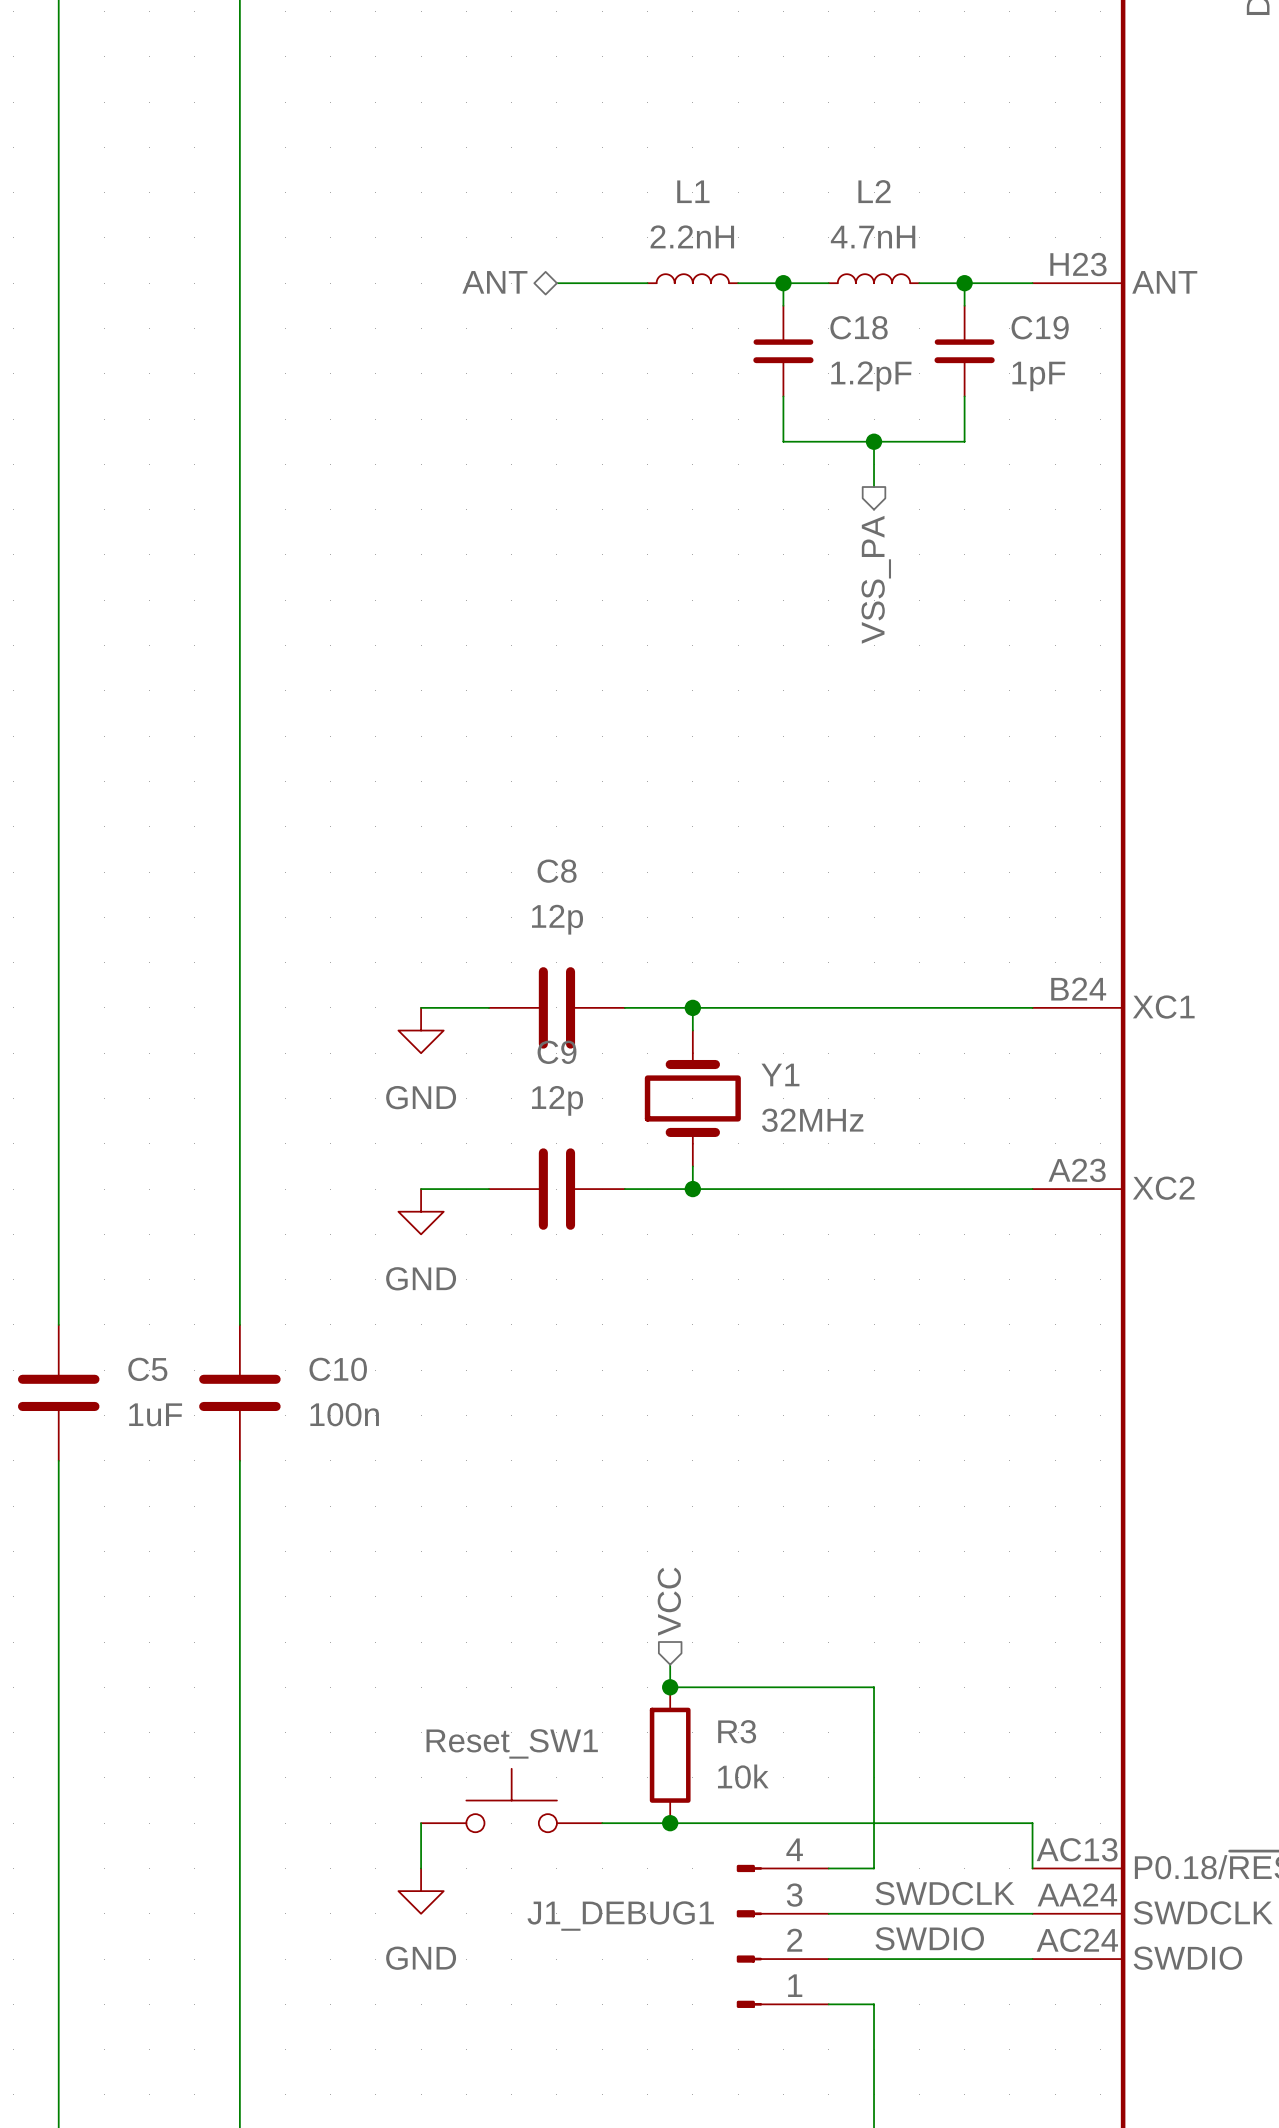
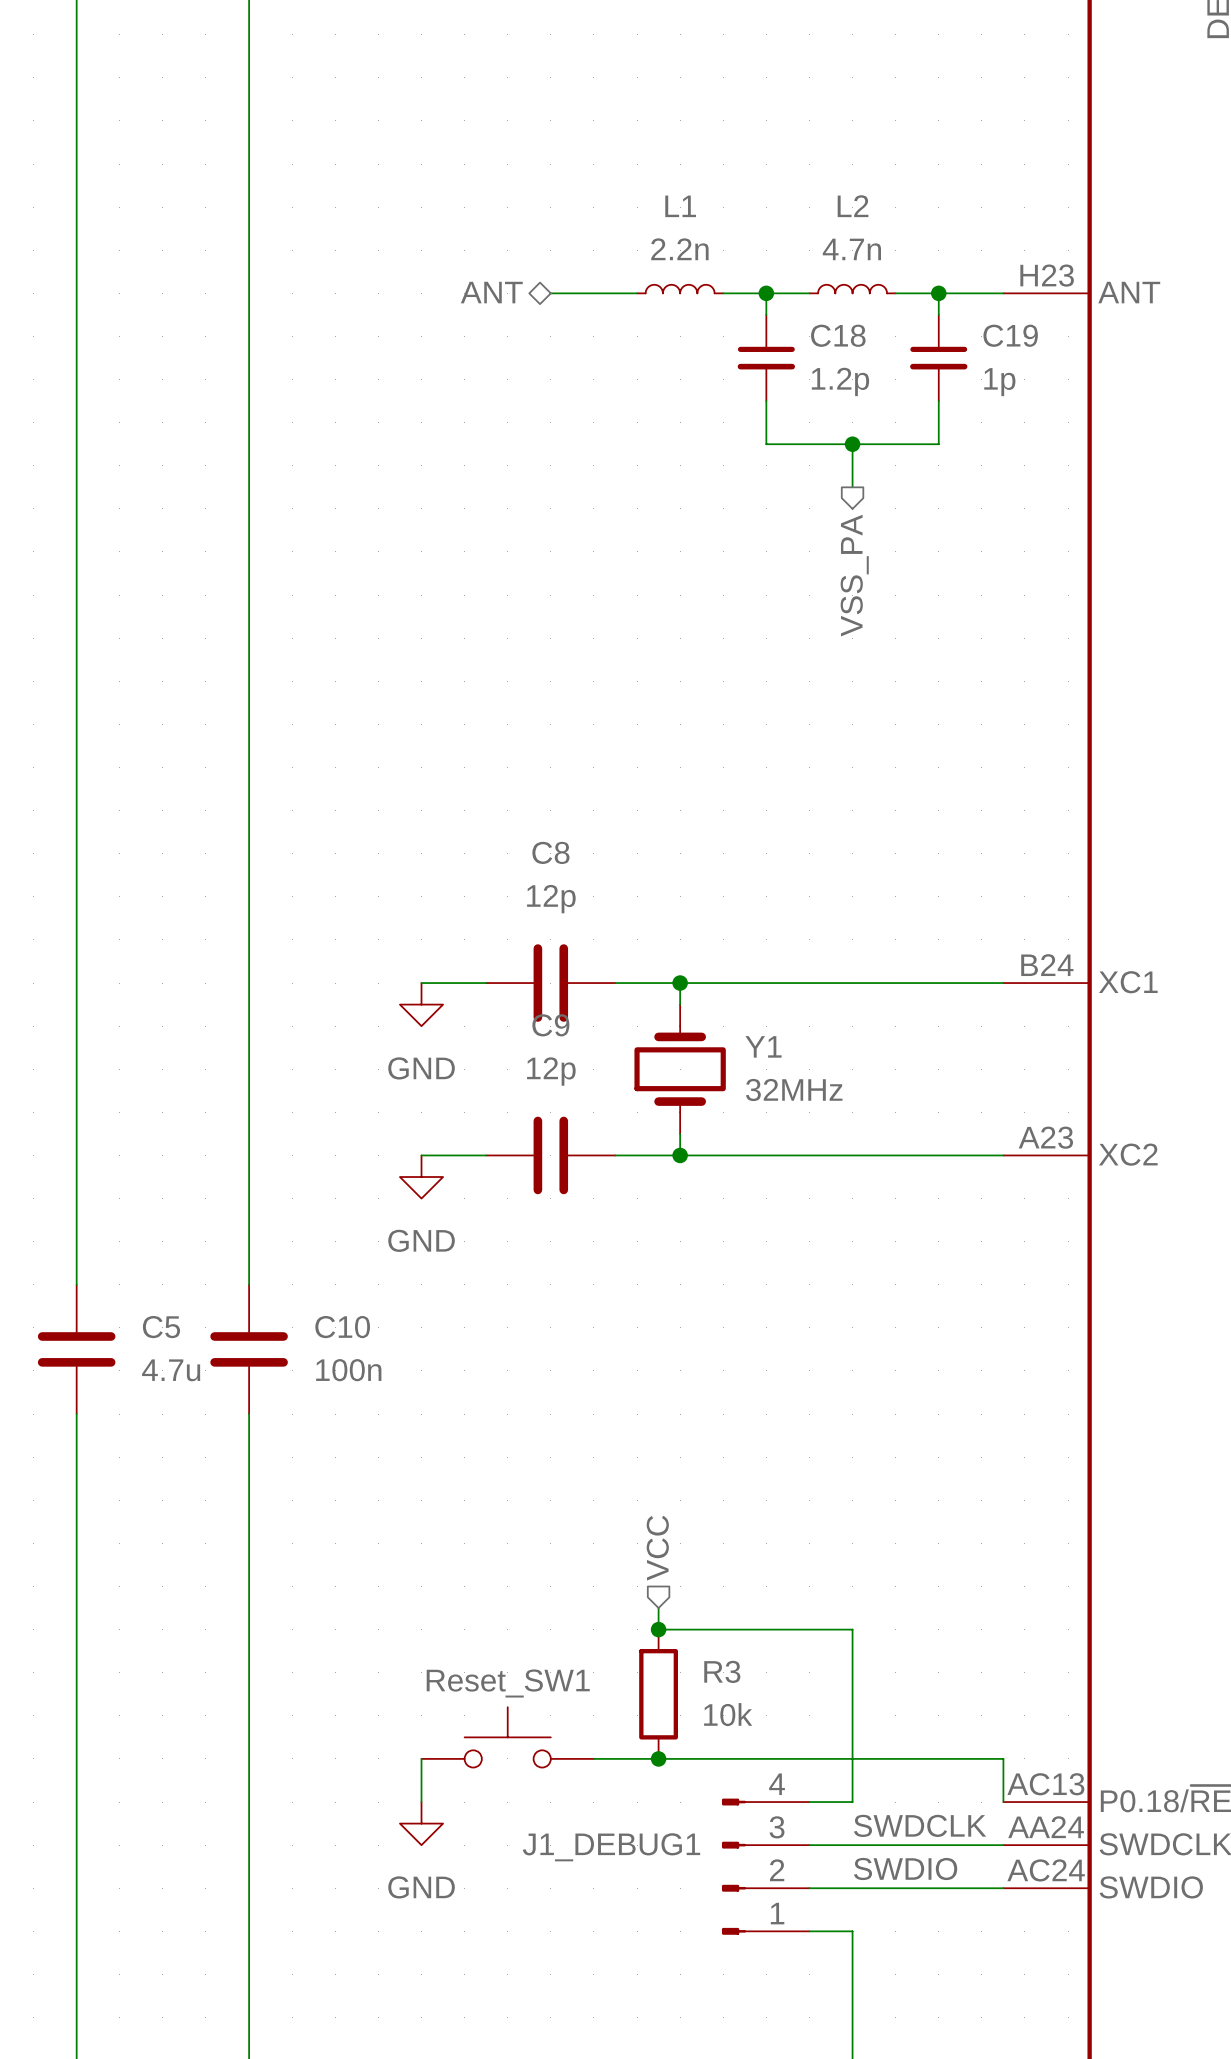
L1 value: 2.2nH (692, 236) -> 2.2n (679, 249)
L2 value: 4.7nH (873, 237) -> 4.7n (851, 249)
C18 value: 1.2pF (871, 376) -> 1.2p (840, 381)
C19 value: 1pF (1038, 376) -> 1p (999, 382)
C5 value: 1uF (155, 1414) -> 4.7u (171, 1370)

